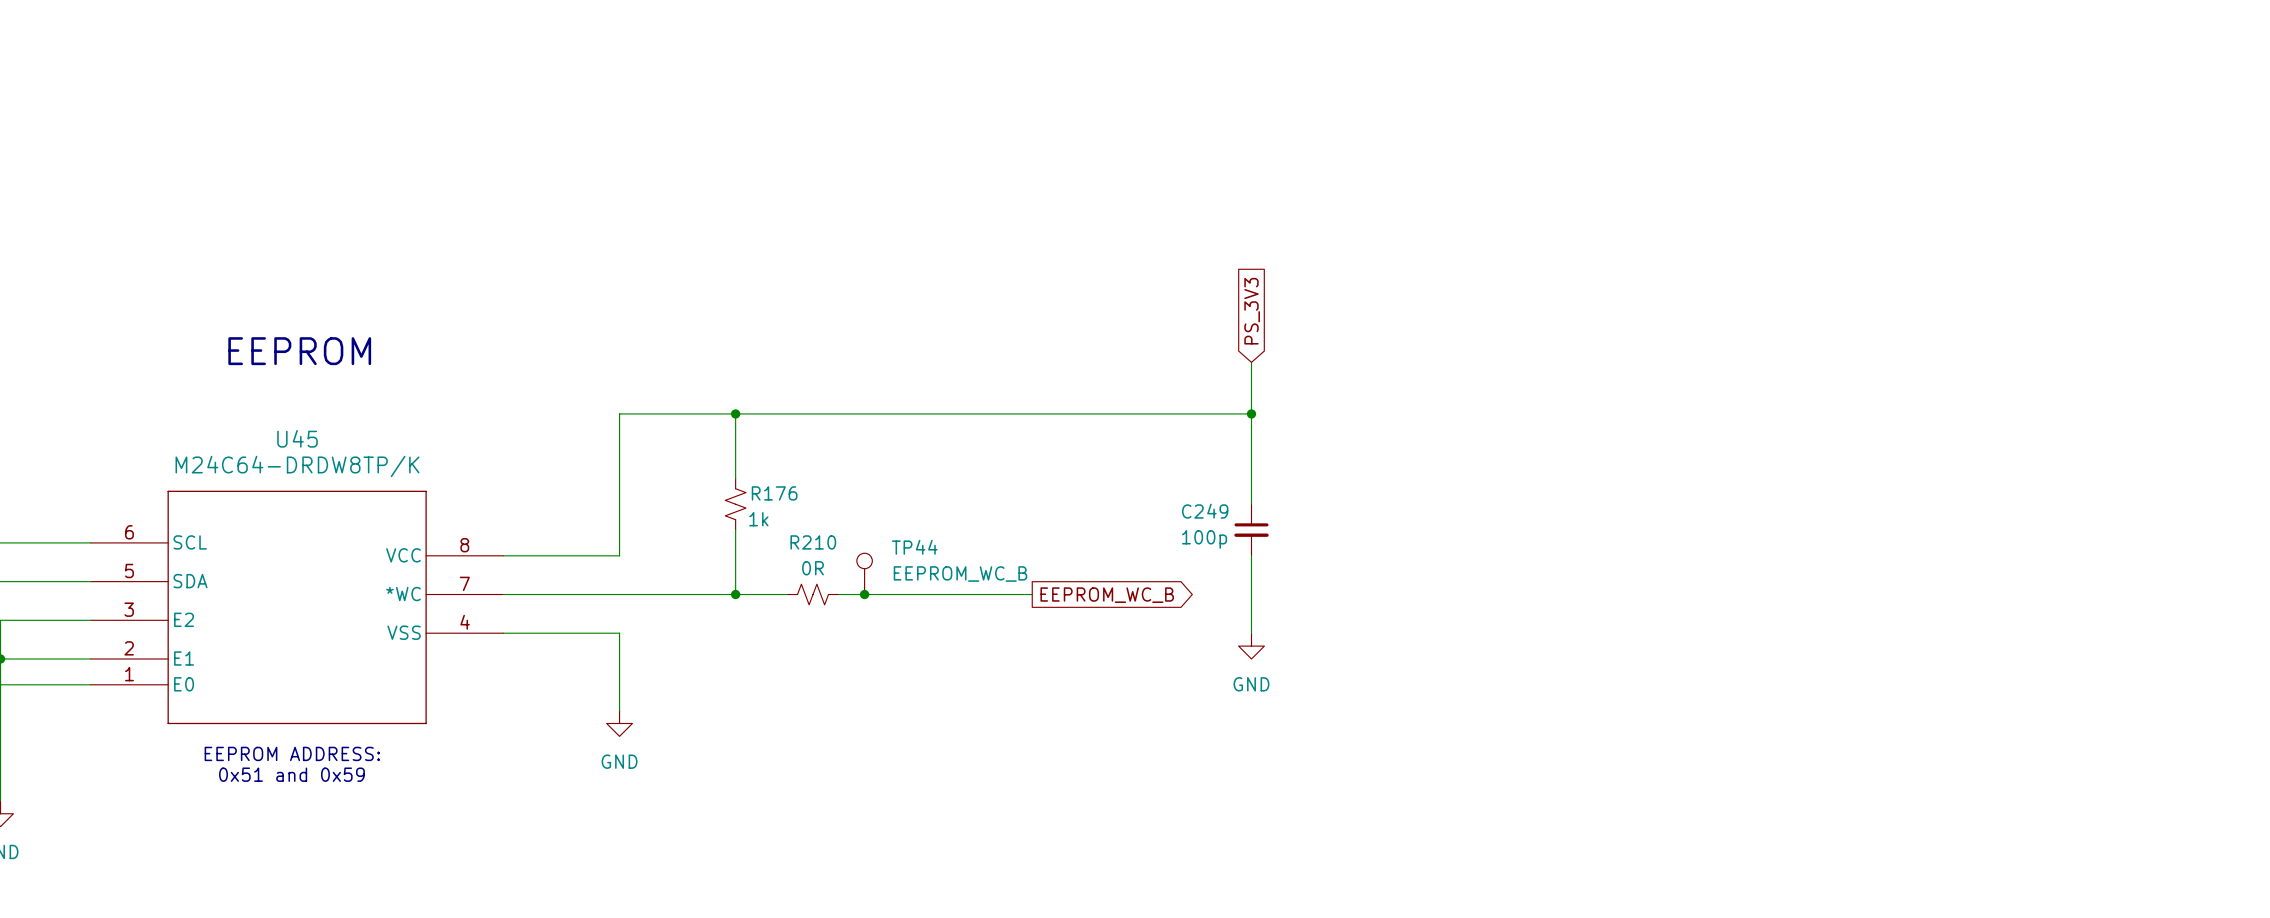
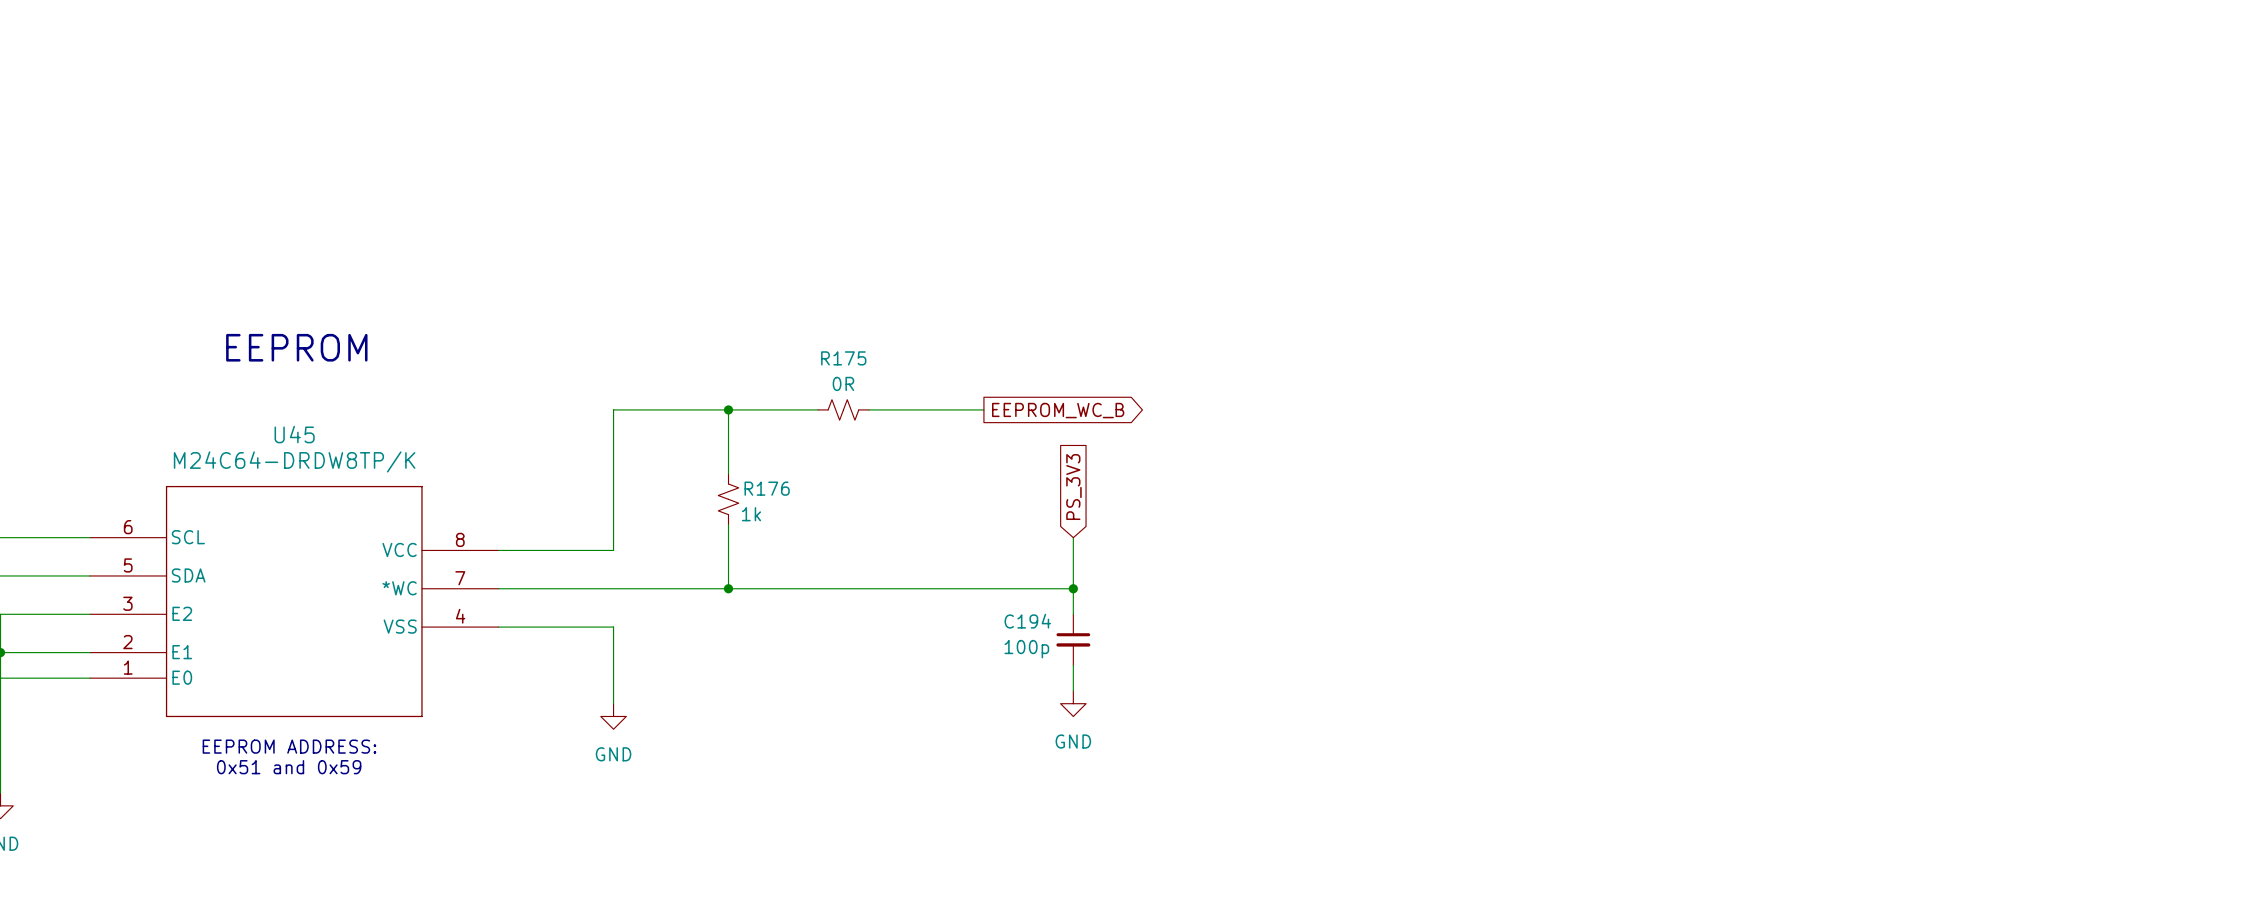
global label position: PS_3V3 (1252, 311) -> PS_3V3 (1073, 487)
wire: (1251, 362) (1251, 504) -> none
wire: (825, 413) (877, 413) -> (779, 588) (830, 588)
R175: none -> 0R (843, 409)
wire: (993, 413) (1251, 413) -> none
junction: (1251, 413) -> none
C249: 100p (1251, 530) -> none
wire: (1251, 555) (1251, 633) -> (1073, 537) (1073, 614)
TP44: EEPROM_WC_B (864, 573) -> none
R210: 0R (813, 594) -> none
junction: (864, 594) -> none
wire: none -> (1022, 588) (1073, 588)
junction: none -> (1073, 588)
global label position: EEPROM_WC_B (1107, 595) -> EEPROM_WC_B (1058, 410)
C194: none -> 100p (1073, 639)
power symbol position: GND (1251, 646) -> GND (1073, 703)
wire: none -> (1073, 665) (1073, 690)

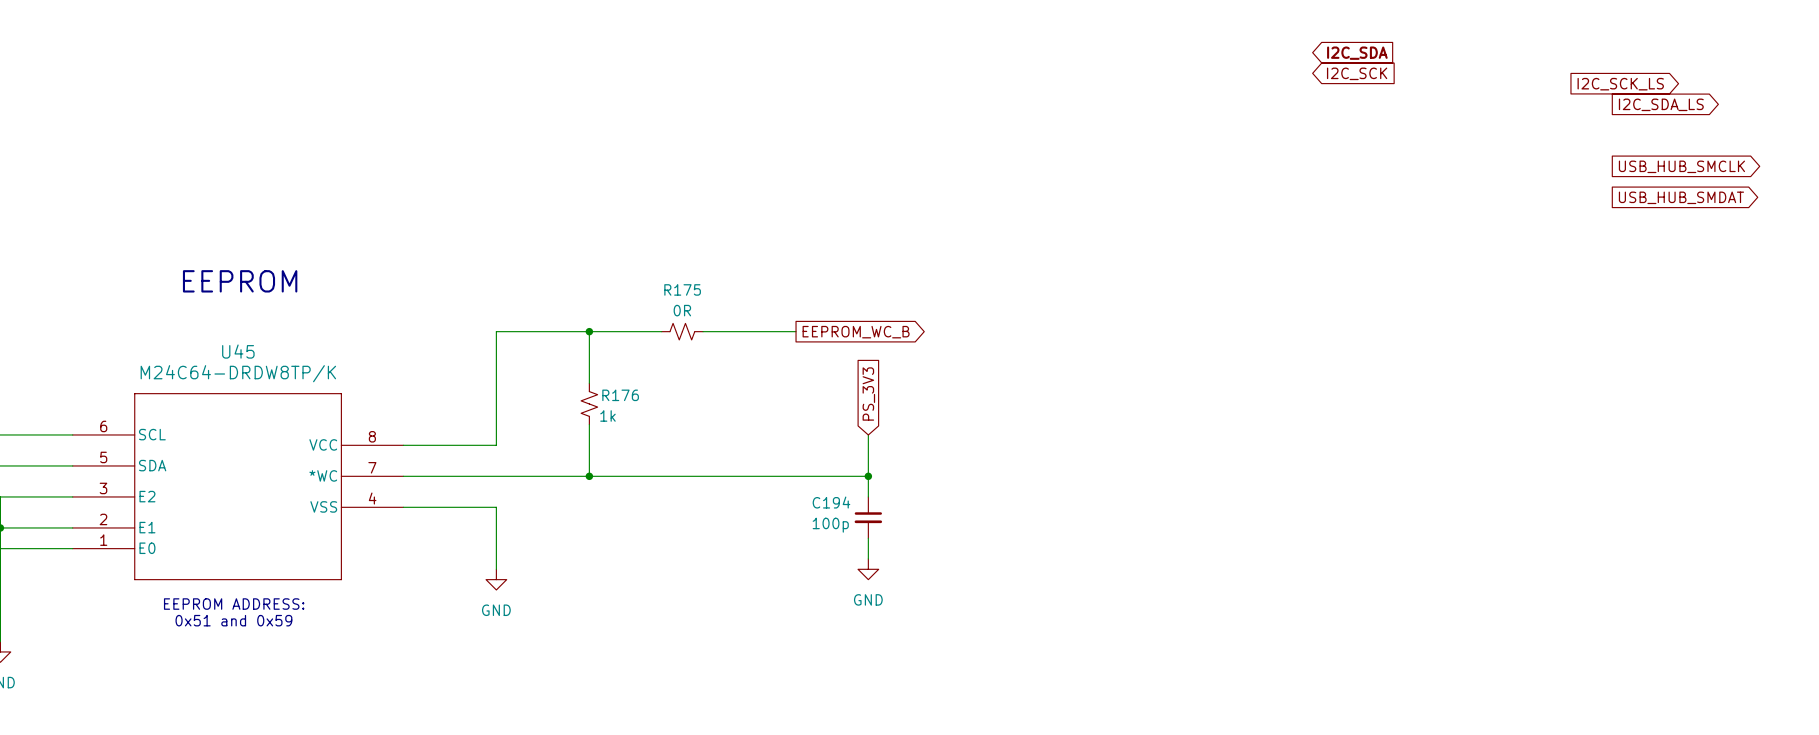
global label: none -> I2C_SDA (1357, 53)
global label: none -> I2C_SCK (1357, 73)
global label: none -> I2C_SCK_LS (1620, 84)
global label: none -> I2C_SDA_LS (1661, 104)
global label: none -> USB_HUB_SMCLK (1681, 166)
global label: none -> USB_HUB_SMDAT (1681, 197)

